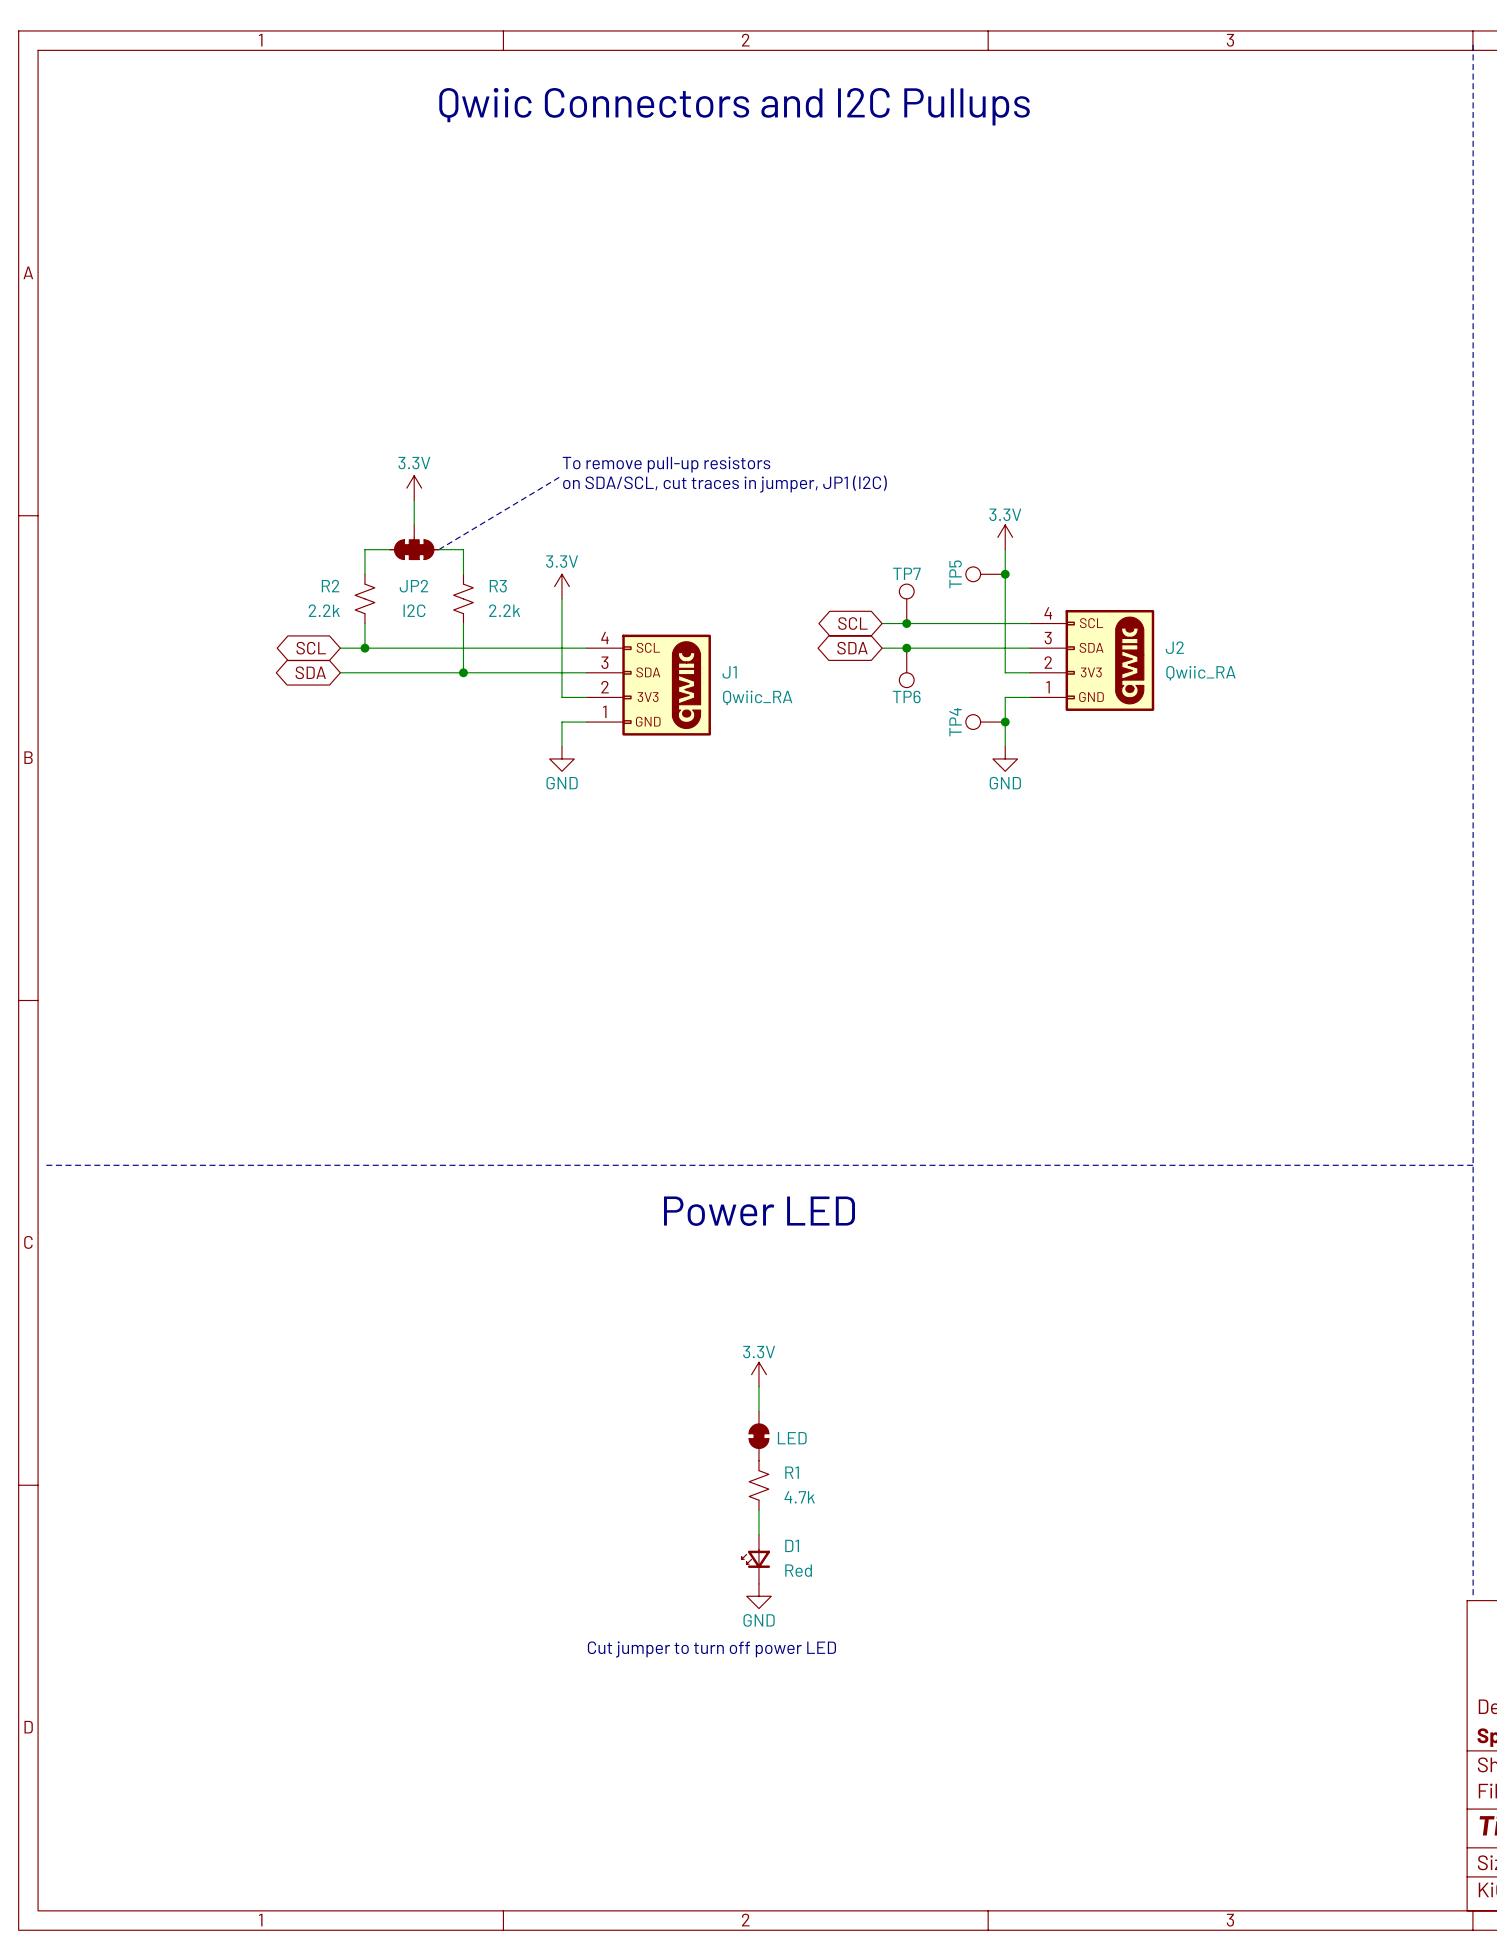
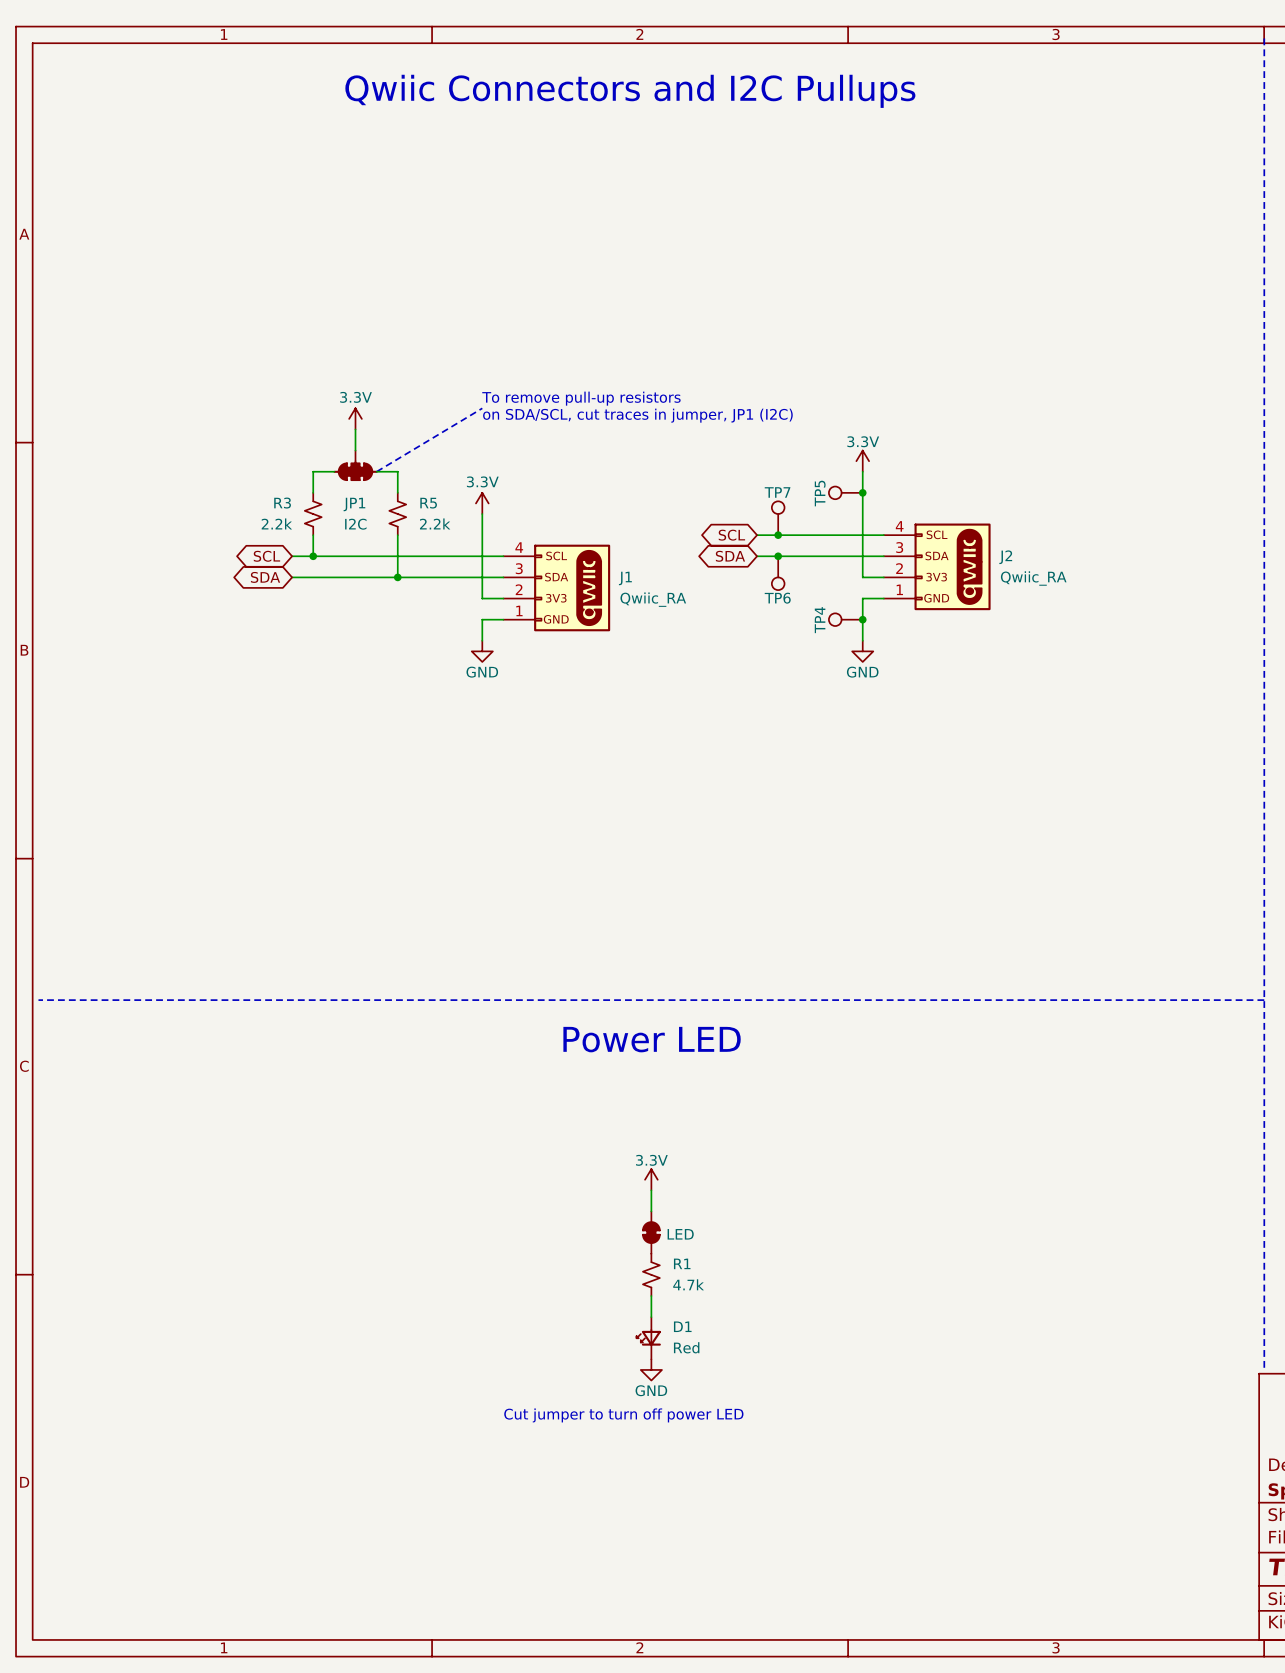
R2 name: R2 (330, 586) -> R3 (282, 503)
JP2 name: JP2 (413, 586) -> JP1 (354, 504)
R3 name: R3 (498, 586) -> R5 (428, 503)

